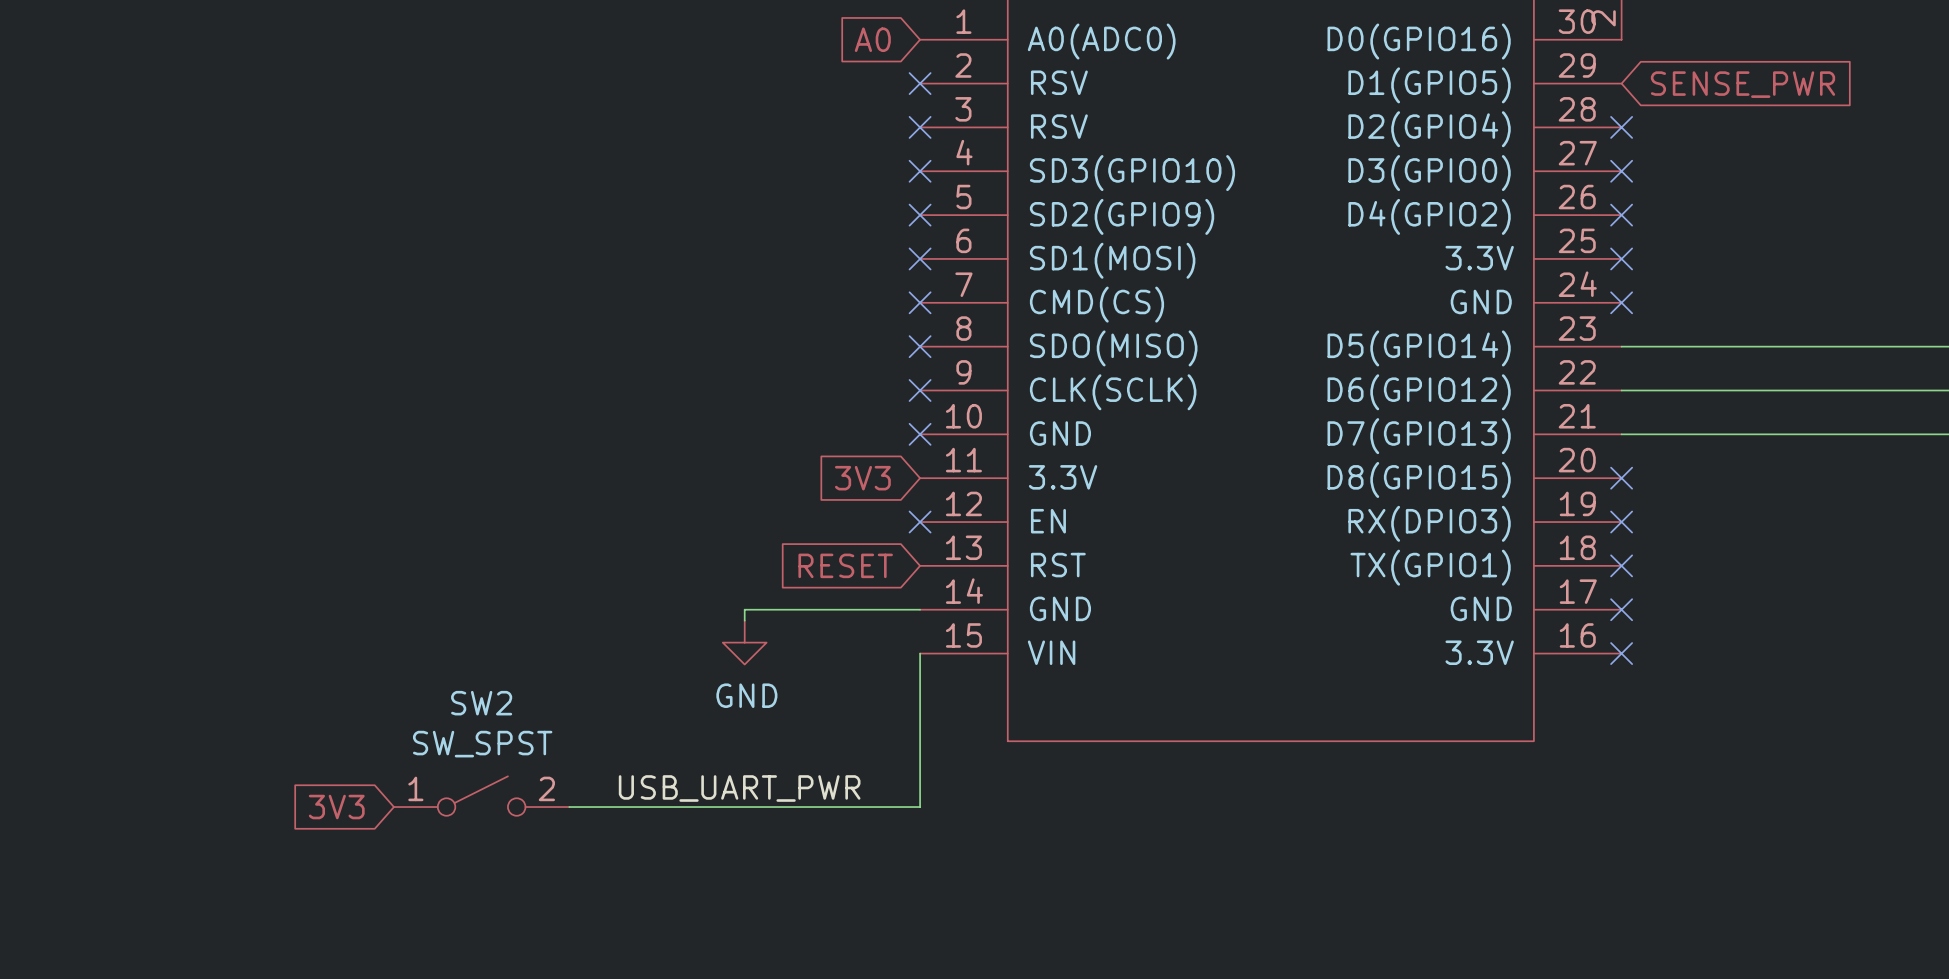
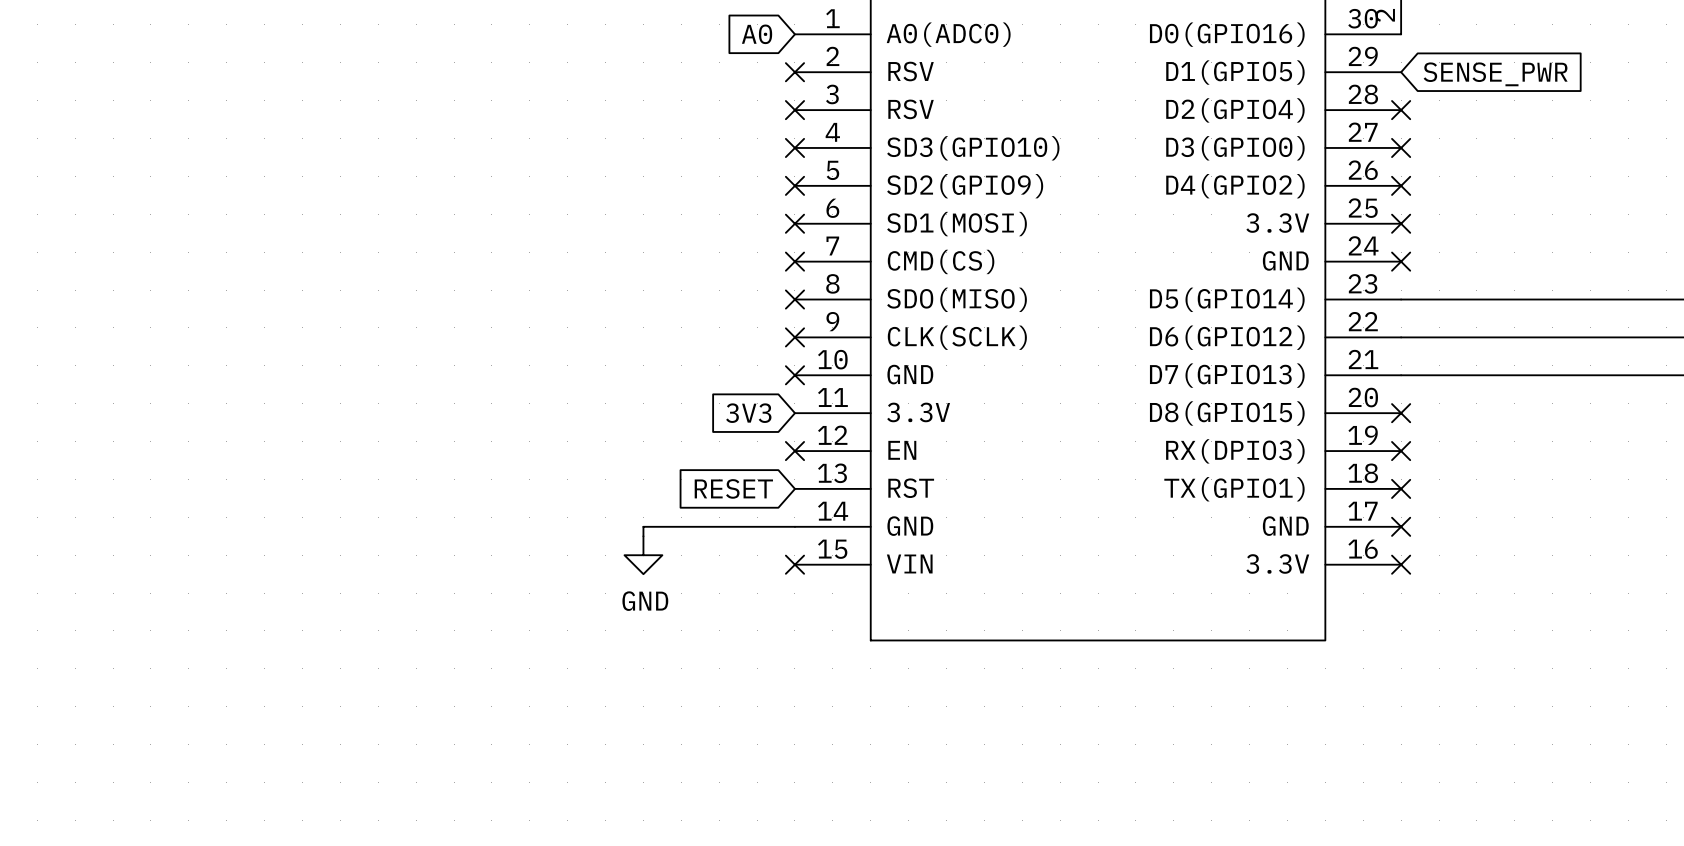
wire: (920, 653) (920, 807) (569, 807) -> none
no-connect mark: none -> (794, 564)
label: USB_UART_PWR (739, 788) -> none
SW2: SW_SPST (481, 796) -> none
global label: 3V3 (336, 807) -> none

